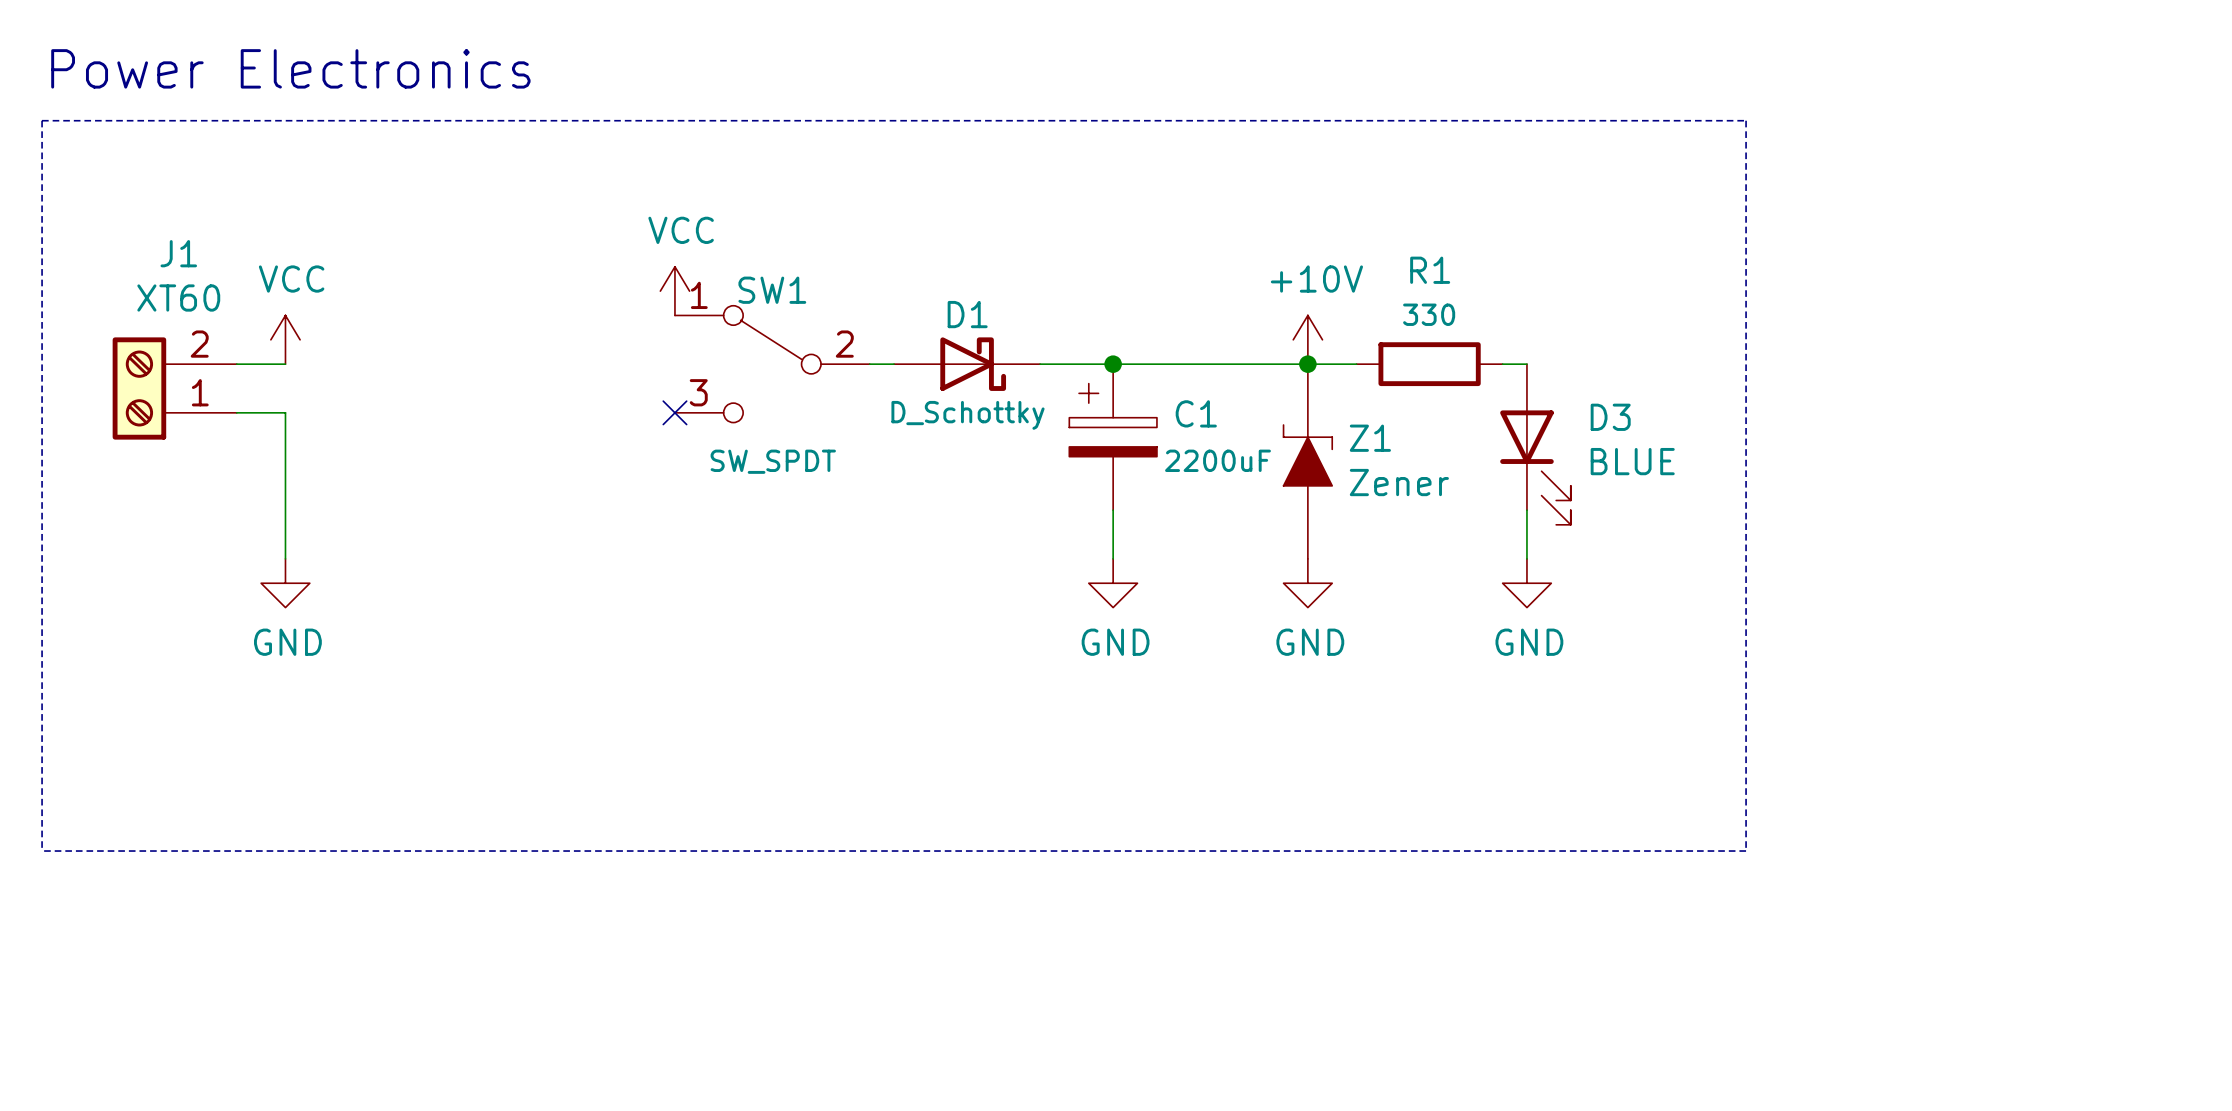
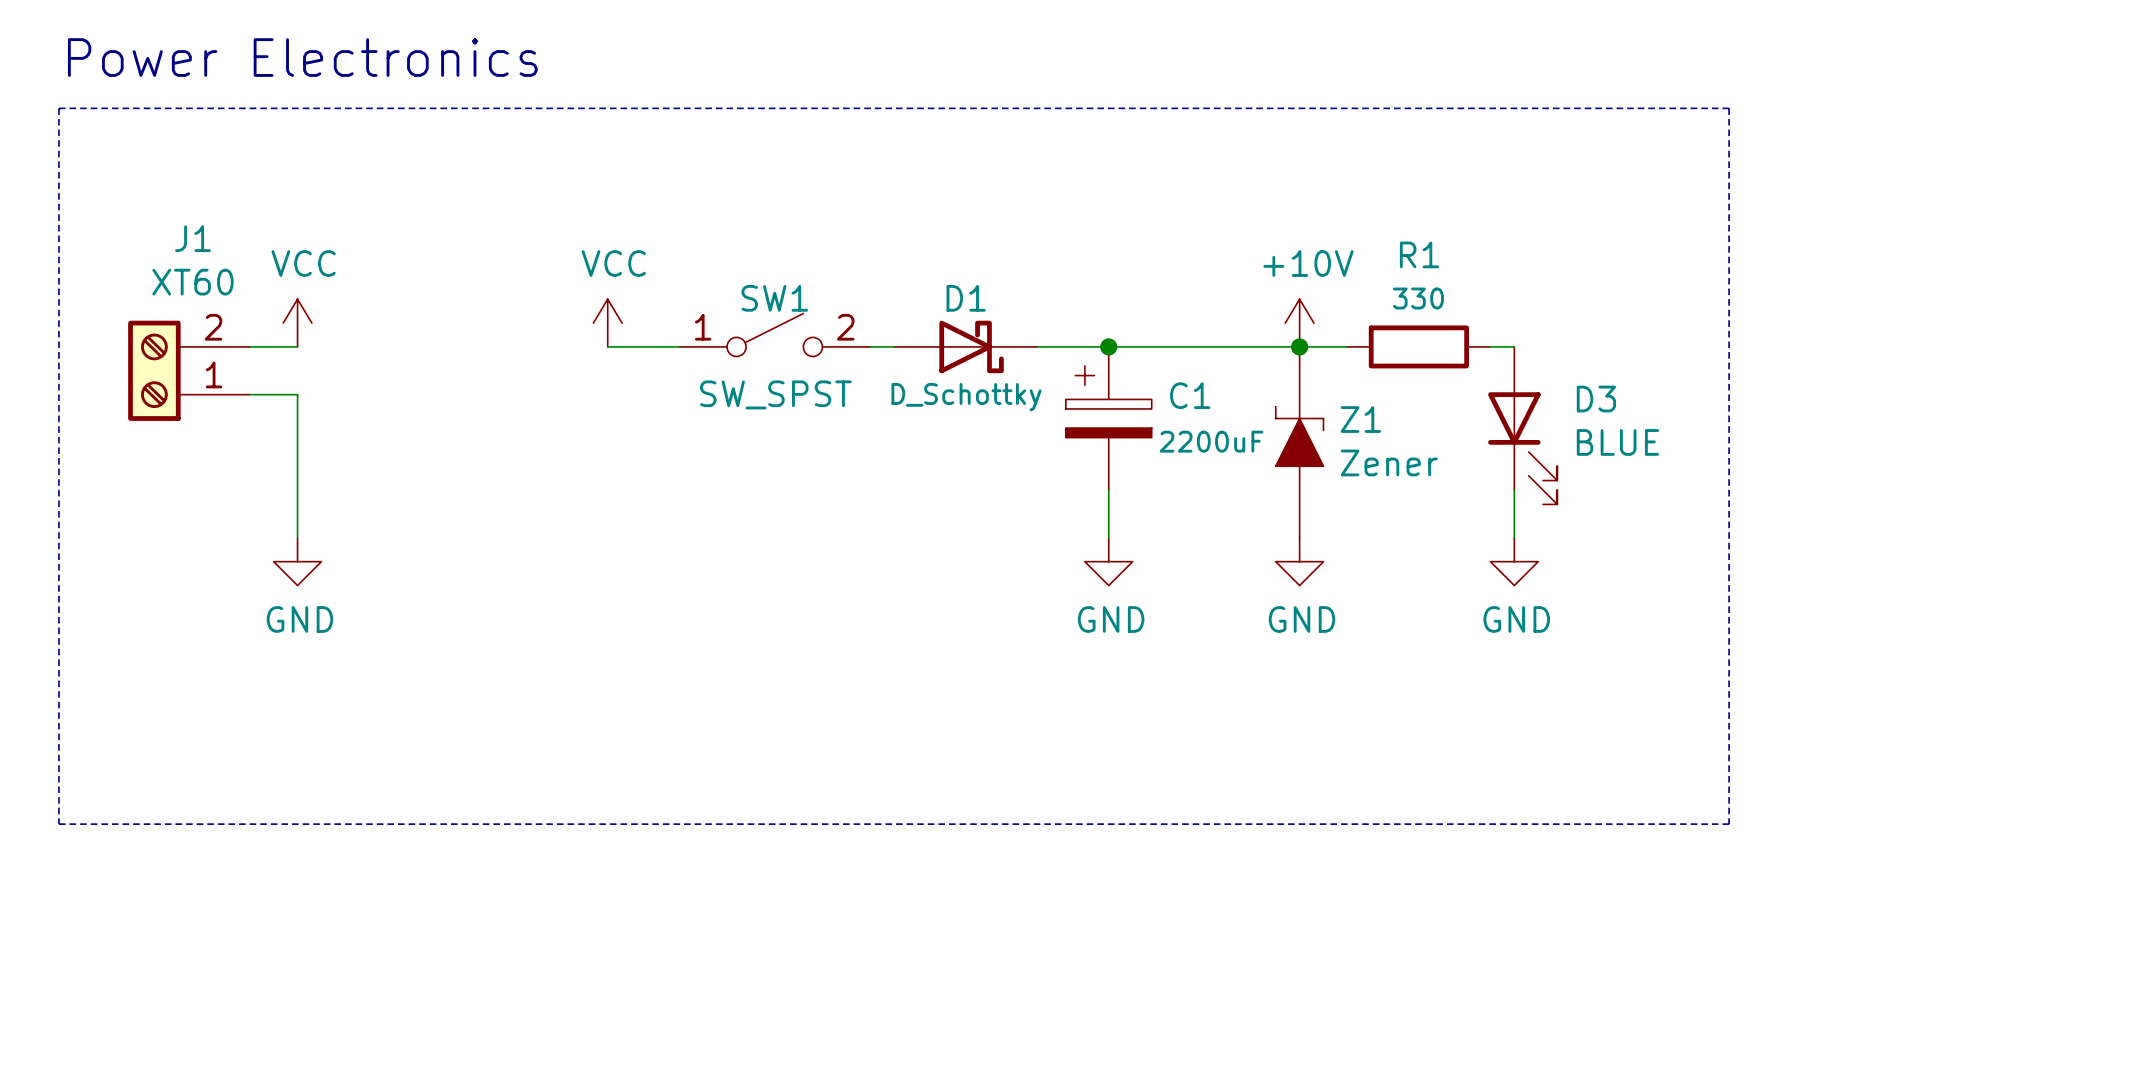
power symbol position: VCC (674, 291) -> VCC (607, 323)
SW1 symbol: [674, 305, 870, 423] -> [679, 313, 871, 357]
wire: none -> (607, 346) (679, 346)
no-connect mark: (674, 412) -> none
SW1 value: SW_SPDT (773, 461) -> SW_SPST (775, 394)

